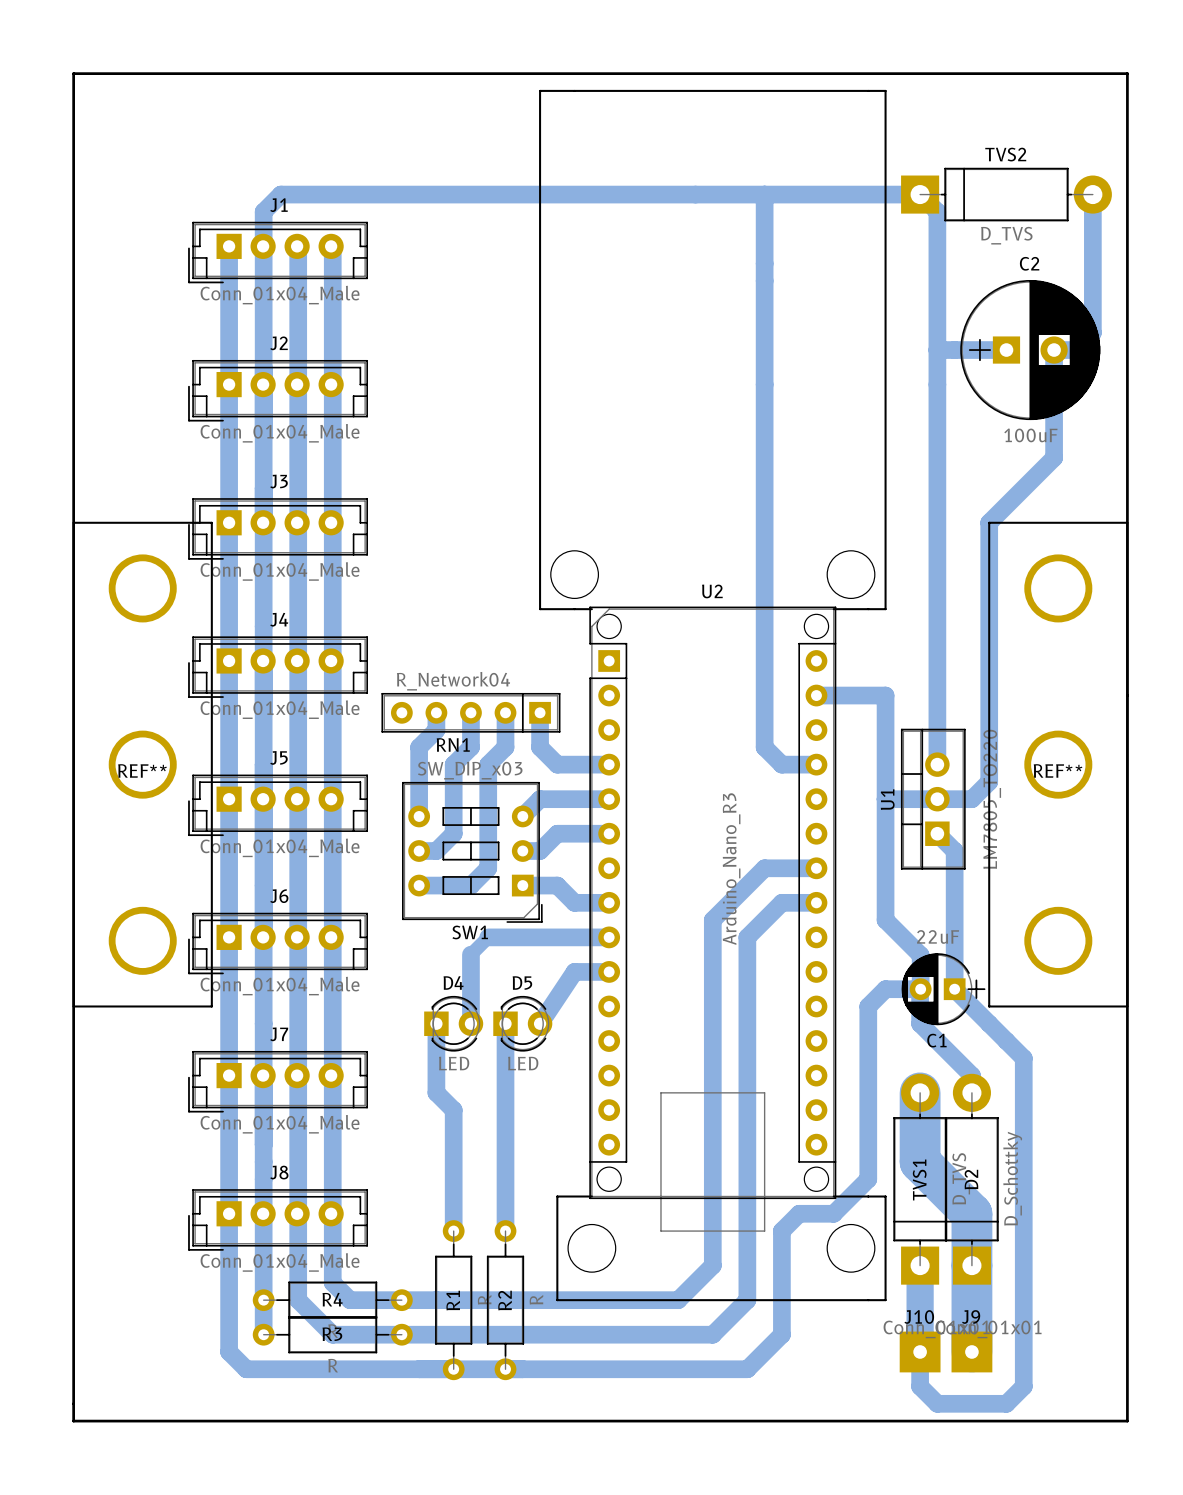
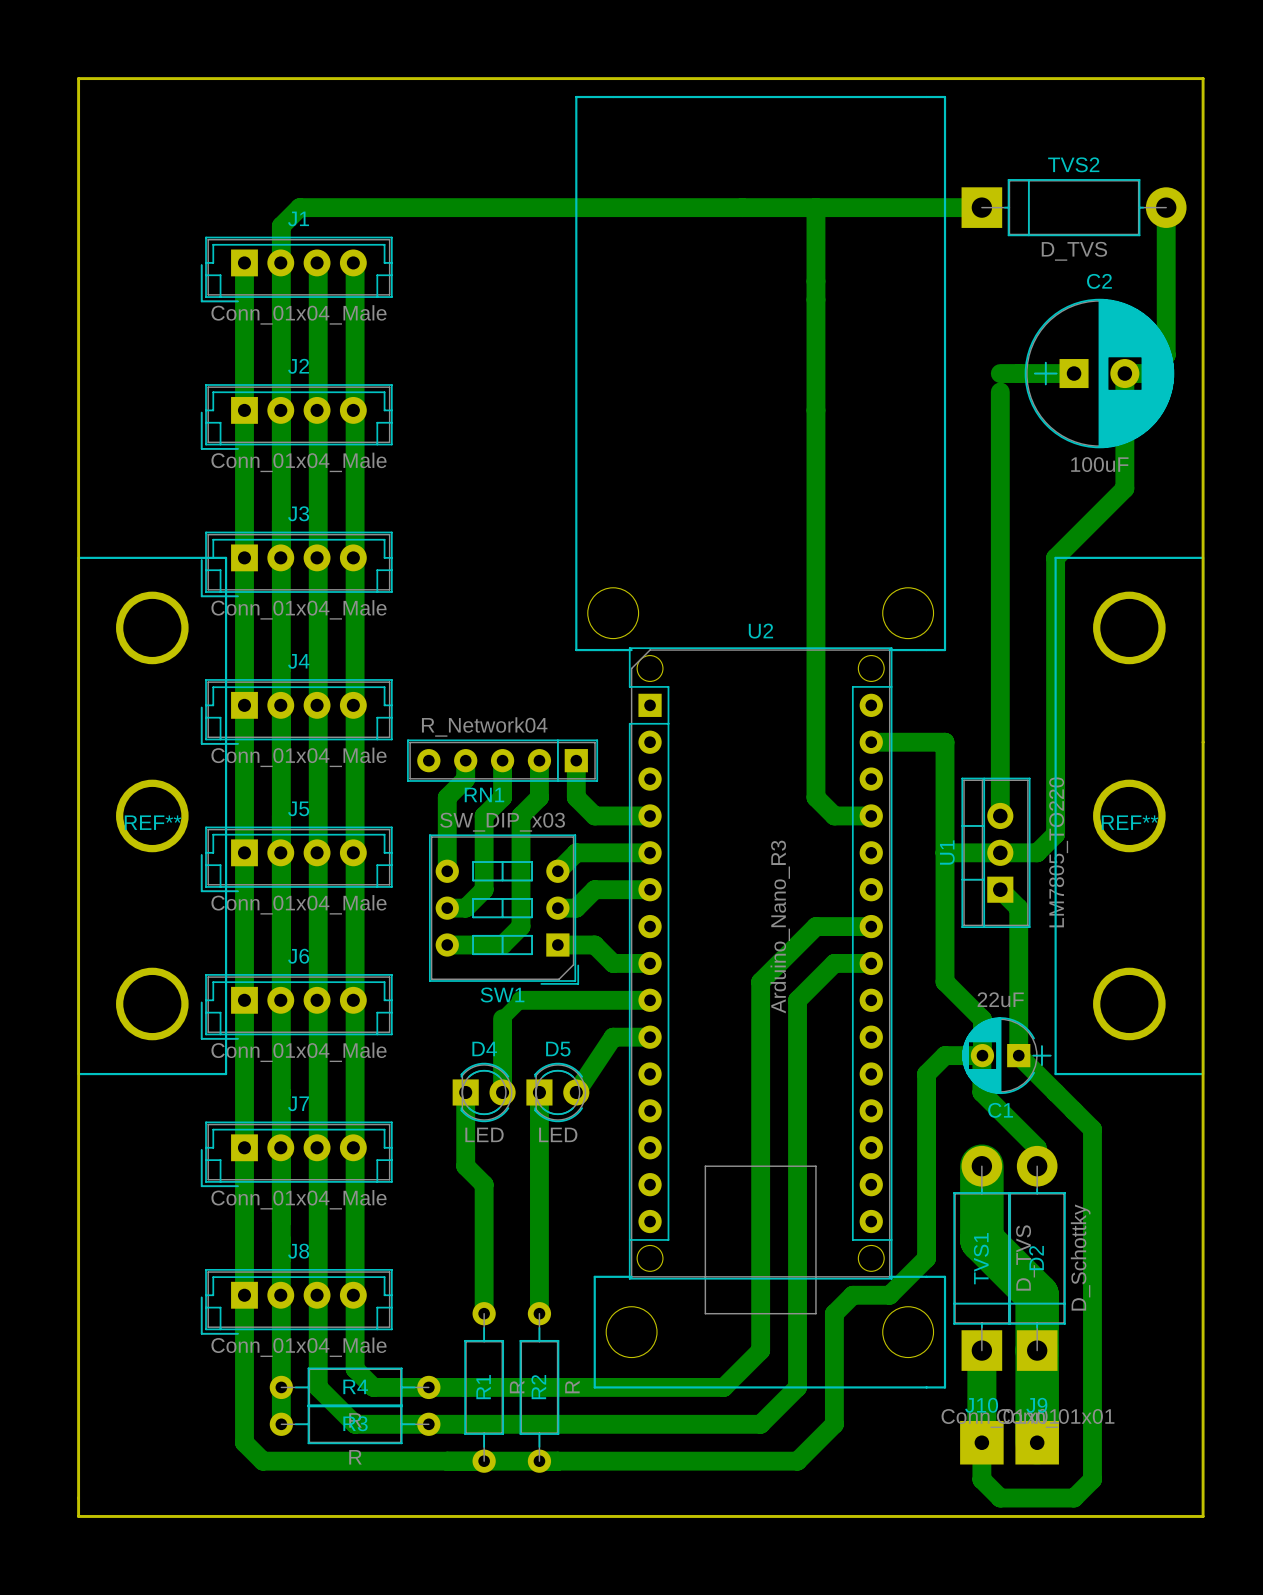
bottom track: (920, 194) (937, 211) (937, 367) -> none

